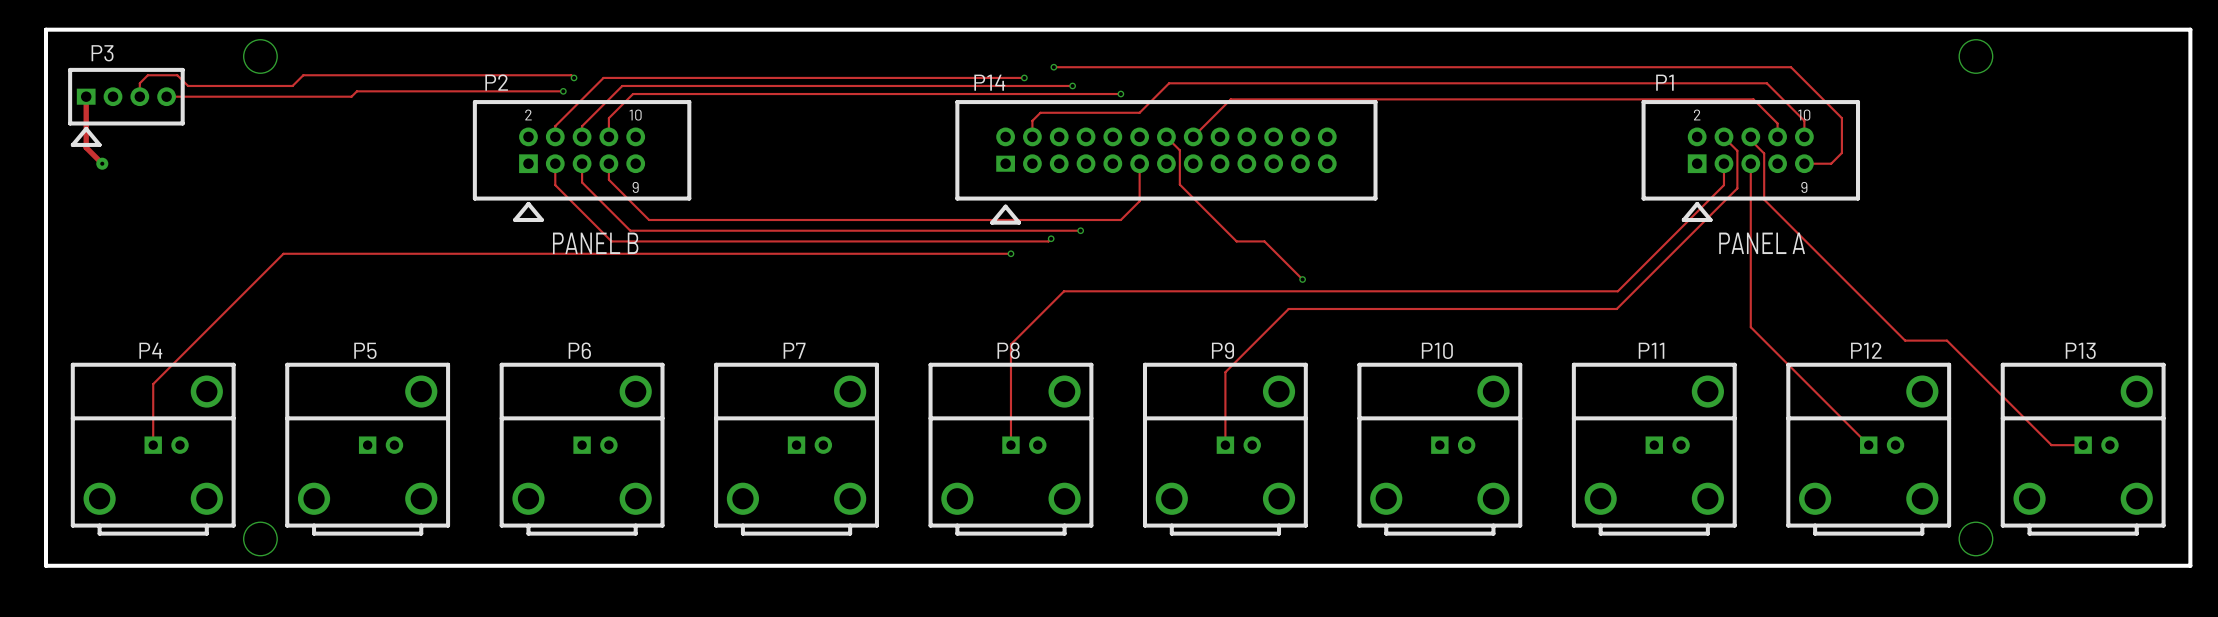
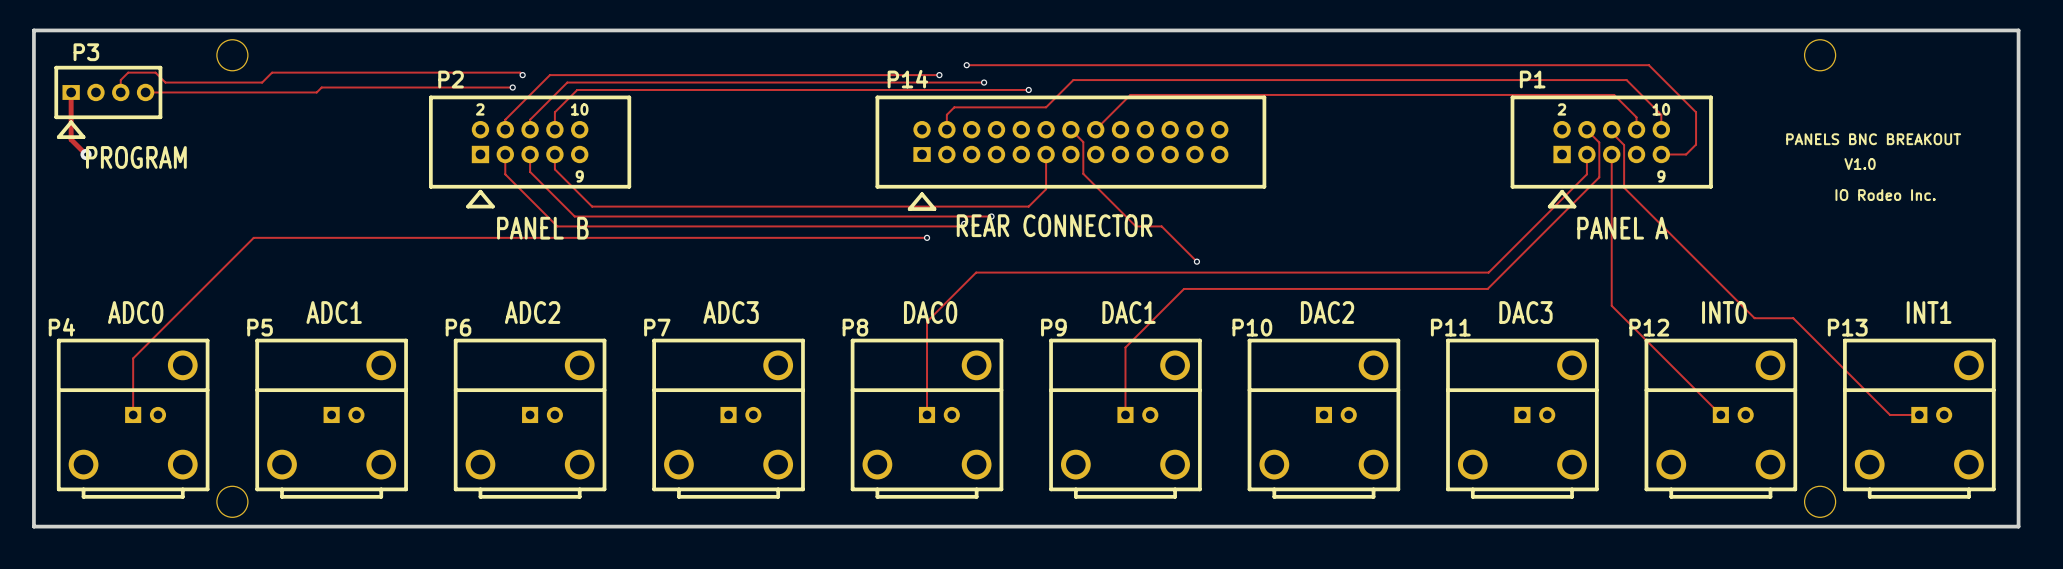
text: none -> PANELS BNC BREAKOUT (1873, 139)
text: none -> PROGRAM (136, 157)
text: none -> V1.0 (1860, 164)
text: none -> IO Rodeo Inc. (1885, 195)
text: none -> REAR CONNECTOR (1054, 225)
text: none -> ADC0 (135, 312)
text: none -> ADC1 (334, 312)
text: none -> ADC2 (532, 312)
text: none -> ADC3 (731, 312)
text: none -> DAC0 (930, 312)
text: none -> DAC1 (1129, 312)
text: none -> DAC2 (1327, 312)
text: none -> DAC3 (1525, 312)
text: none -> INT0 (1724, 312)
text: none -> INT1 (1929, 312)
P4 name position: P4 (150, 350) -> P4 (61, 327)
P5 name position: P5 (365, 350) -> P5 (260, 327)
P6 name position: P6 (579, 350) -> P6 (458, 327)
P7 name position: P7 (794, 350) -> P7 (657, 327)
P8 name position: P8 (1008, 350) -> P8 (855, 327)
P9 name position: P9 (1222, 350) -> P9 (1053, 327)
P10 name position: P10 (1437, 350) -> P10 (1252, 327)
P11 name position: P11 (1651, 350) -> P11 (1450, 327)
P12 name position: P12 (1866, 350) -> P12 (1649, 327)
P13 name position: P13 (2080, 350) -> P13 (1847, 327)

